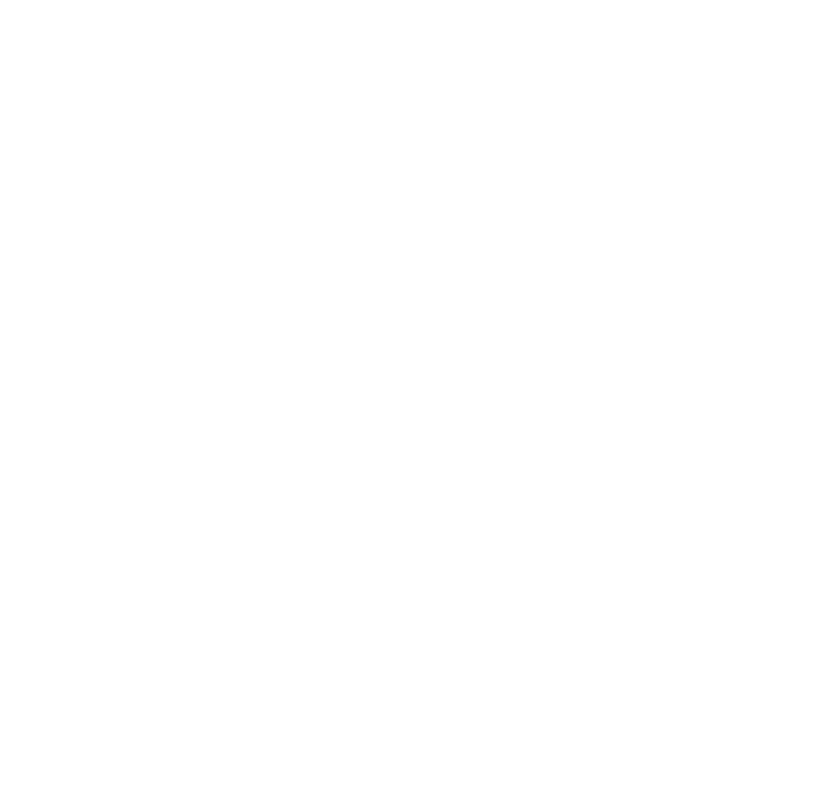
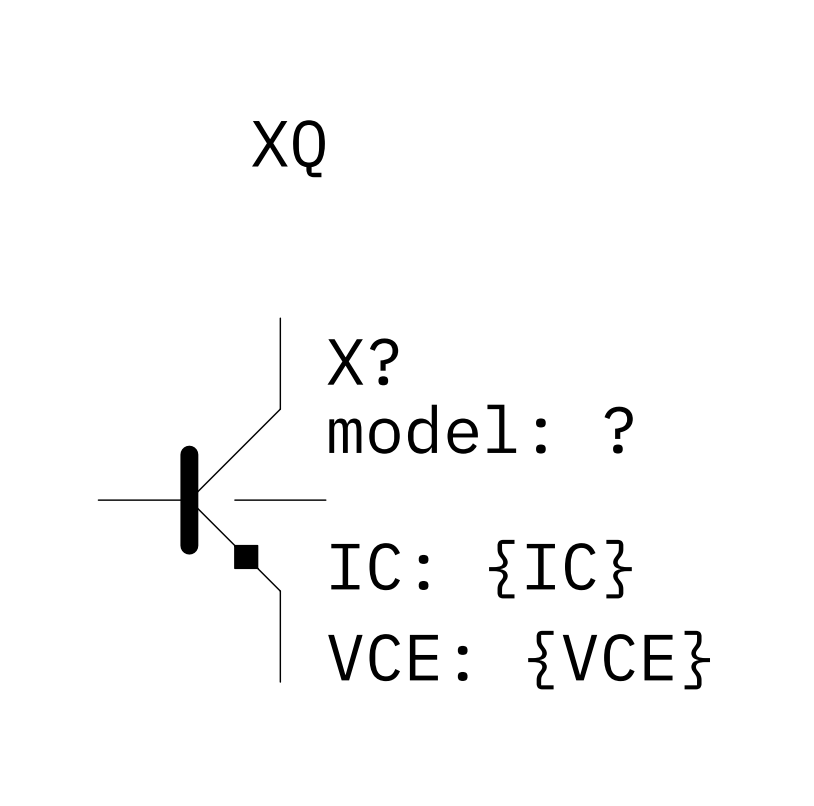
text: none -> XQ (288, 148)
X?: none -> (212, 500)

